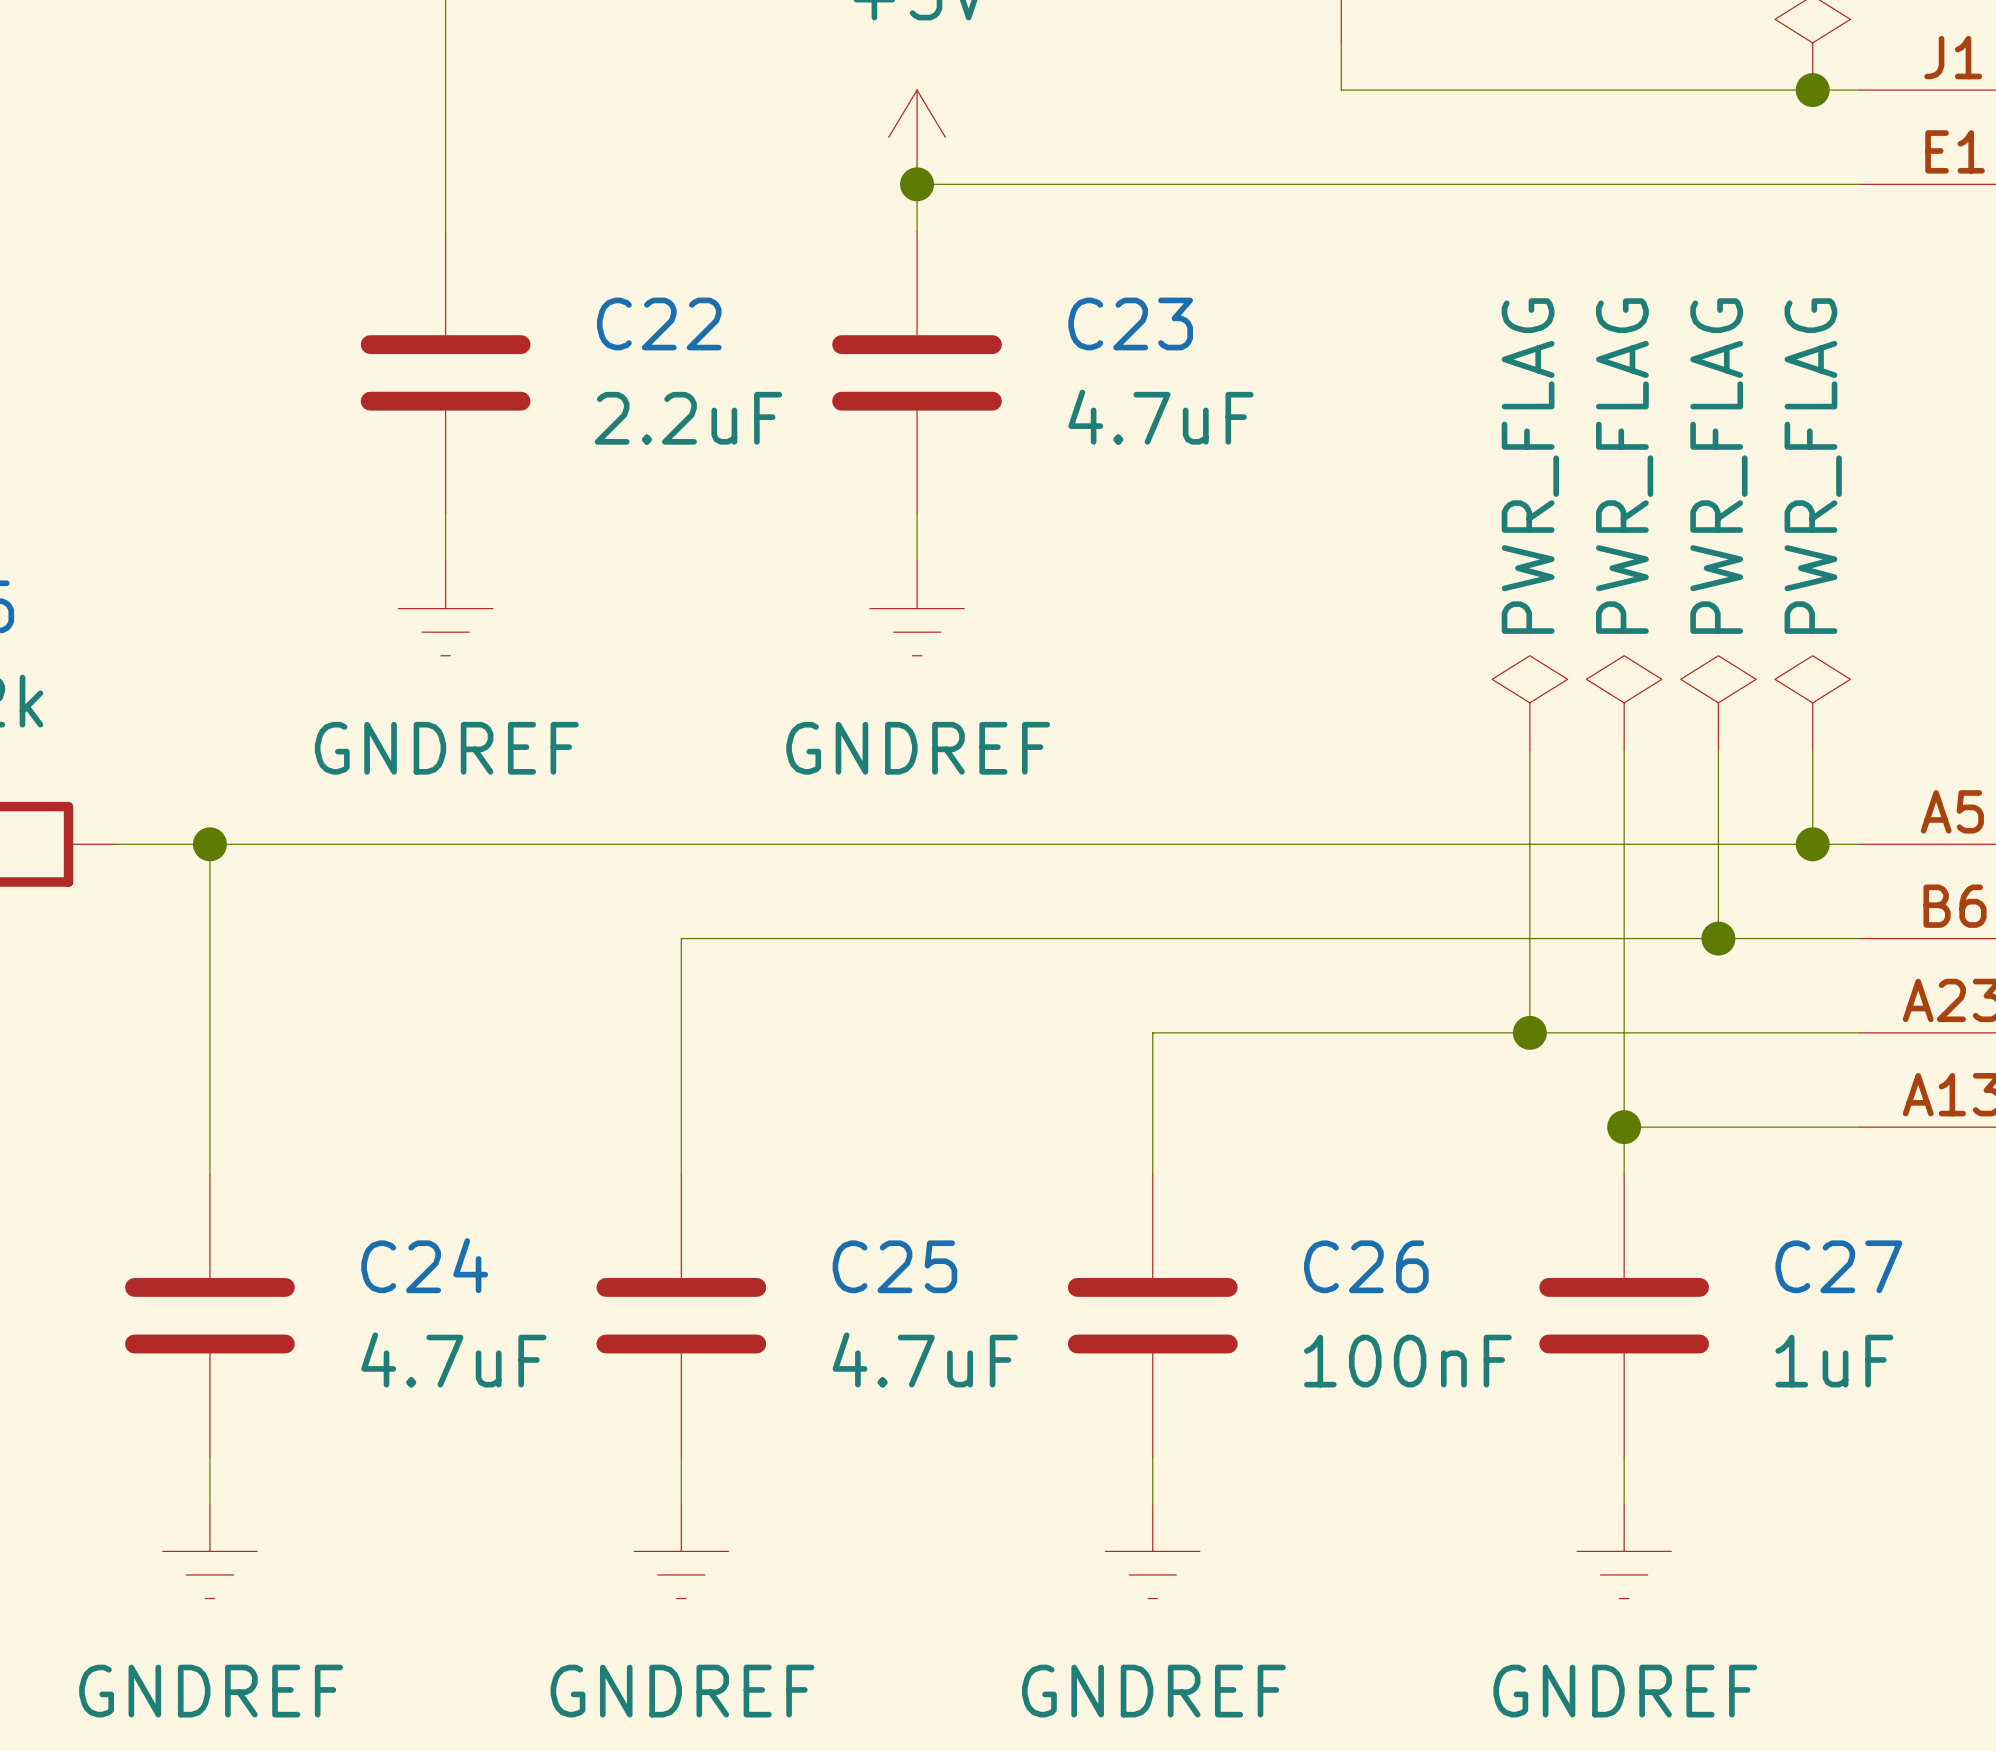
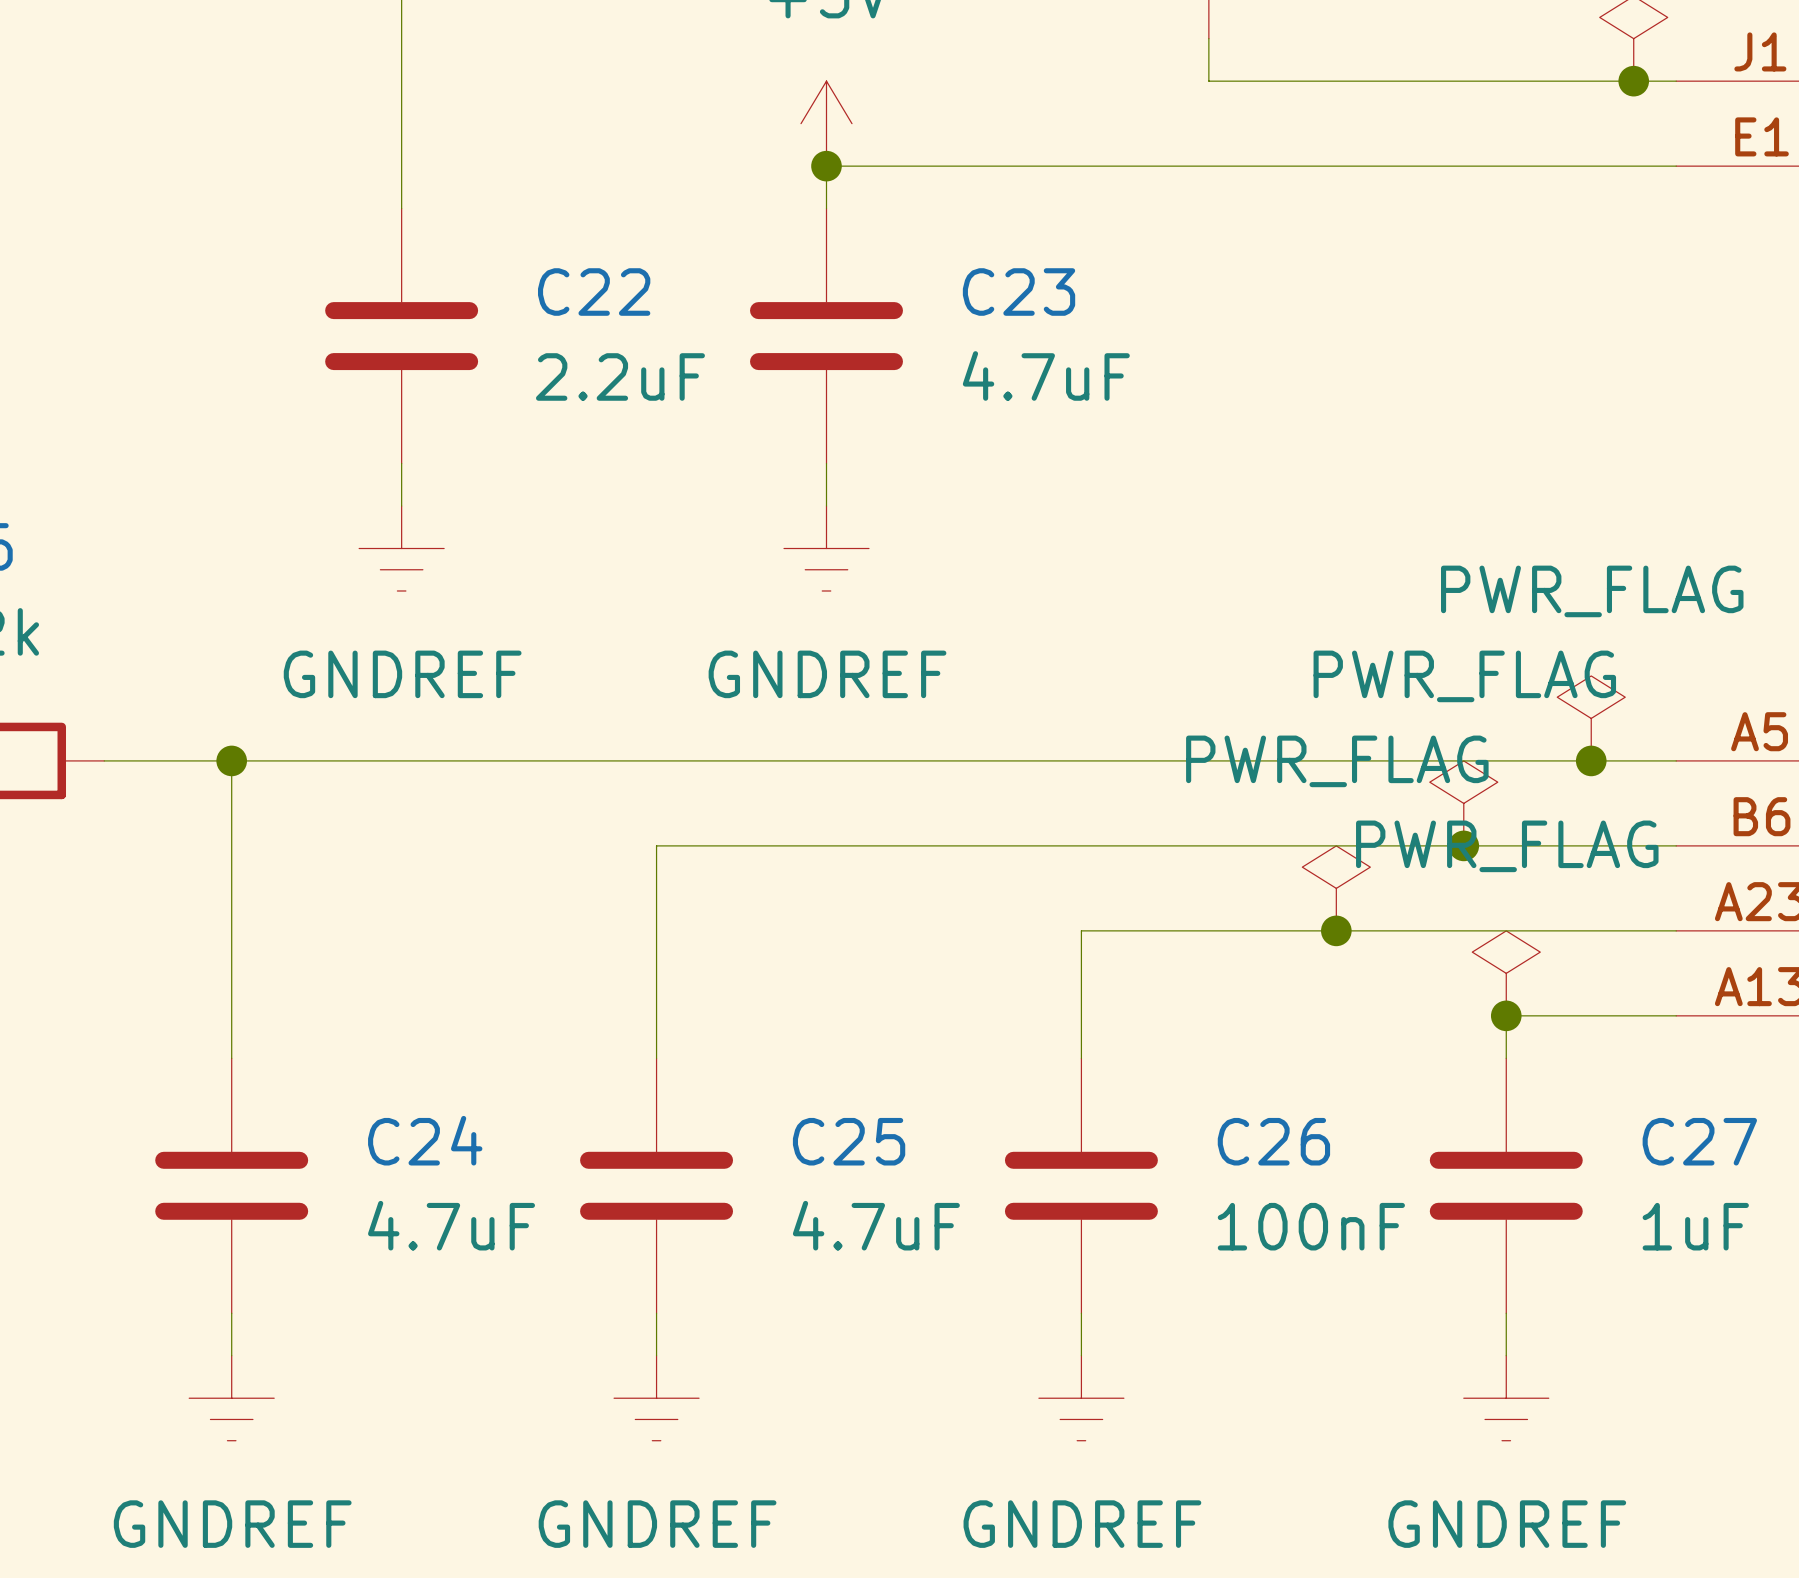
power symbol: PWR_FLAG (1529, 702) -> none
power symbol: PWR_FLAG (1624, 702) -> none
power symbol: PWR_FLAG (1718, 702) -> none
power symbol: PWR_FLAG (1812, 702) -> none
wire: (1529, 750) (1529, 1032) -> none
wire: (1624, 750) (1624, 1174) -> none
wire: (1718, 750) (1718, 938) -> none
wire: (1812, 750) (1812, 844) -> none
power symbol: none -> PWR_FLAG (1591, 718)
wire: (209, 844) (209, 1174) -> (231, 760) (231, 1058)
junction position: (209, 844) -> (231, 760)
junction position: (1812, 844) -> (1591, 760)
power symbol: none -> PWR_FLAG (1463, 803)
wire: (728, 938) (681, 938) (681, 1174) -> (656, 845) (656, 1058)
junction: none -> (1463, 845)
junction: (1718, 938) -> none
power symbol: none -> PWR_FLAG (1336, 888)
wire: (1199, 1032) (1152, 1032) (1152, 1174) -> (1081, 930) (1081, 1058)
junction position: (1529, 1032) -> (1336, 930)
power symbol: none -> PWR_FLAG (1506, 973)
wire: (1624, 1127) (1671, 1127) -> (1506, 1058) (1506, 1015)
junction position: (1624, 1127) -> (1506, 1015)
C24 position: (209, 1315) -> (231, 1185)
C25 position: (681, 1315) -> (656, 1185)
C26 position: (1152, 1315) -> (1081, 1185)
C27 position: (1624, 1315) -> (1506, 1185)
wire: (209, 1457) (209, 1504) -> (231, 1313) (231, 1355)
wire: (681, 1457) (681, 1504) -> (656, 1313) (656, 1355)
wire: (1152, 1457) (1152, 1504) -> (1081, 1313) (1081, 1355)
wire: (1624, 1457) (1624, 1504) -> (1506, 1313) (1506, 1355)
power symbol position: GNDREF (209, 1551) -> GNDREF (231, 1398)
power symbol position: GNDREF (681, 1551) -> GNDREF (656, 1398)
power symbol position: GNDREF (1152, 1551) -> GNDREF (1081, 1398)
power symbol position: GNDREF (1624, 1551) -> GNDREF (1506, 1398)

